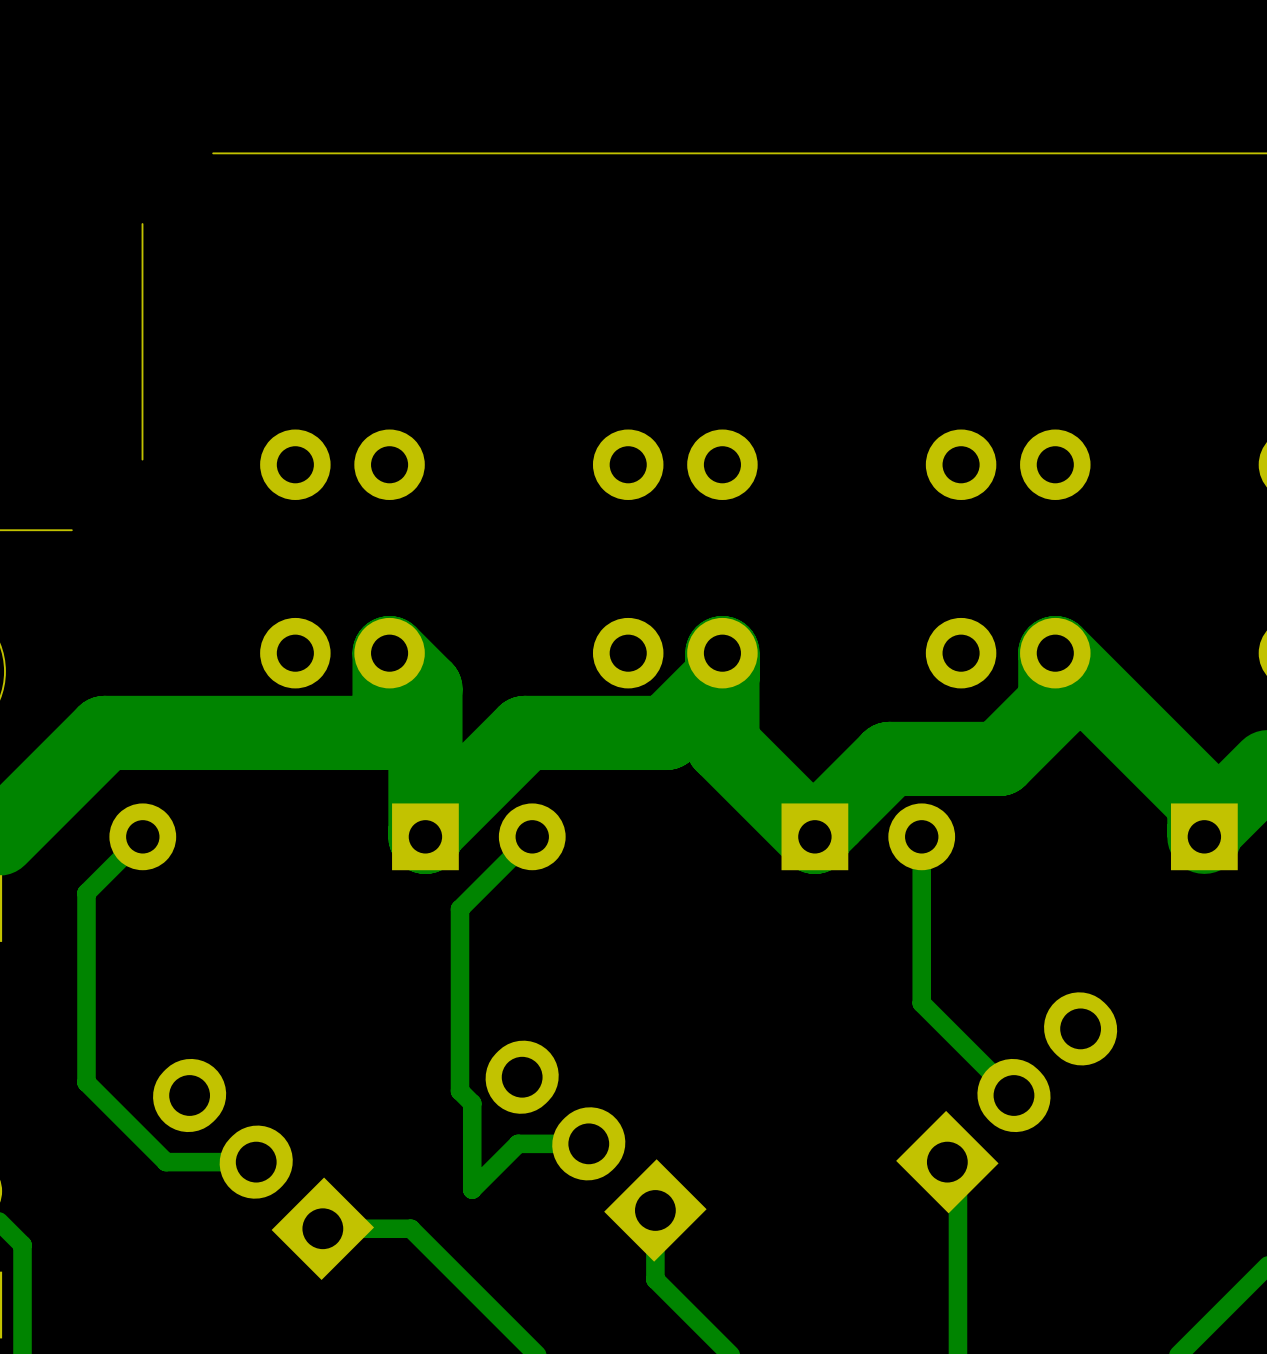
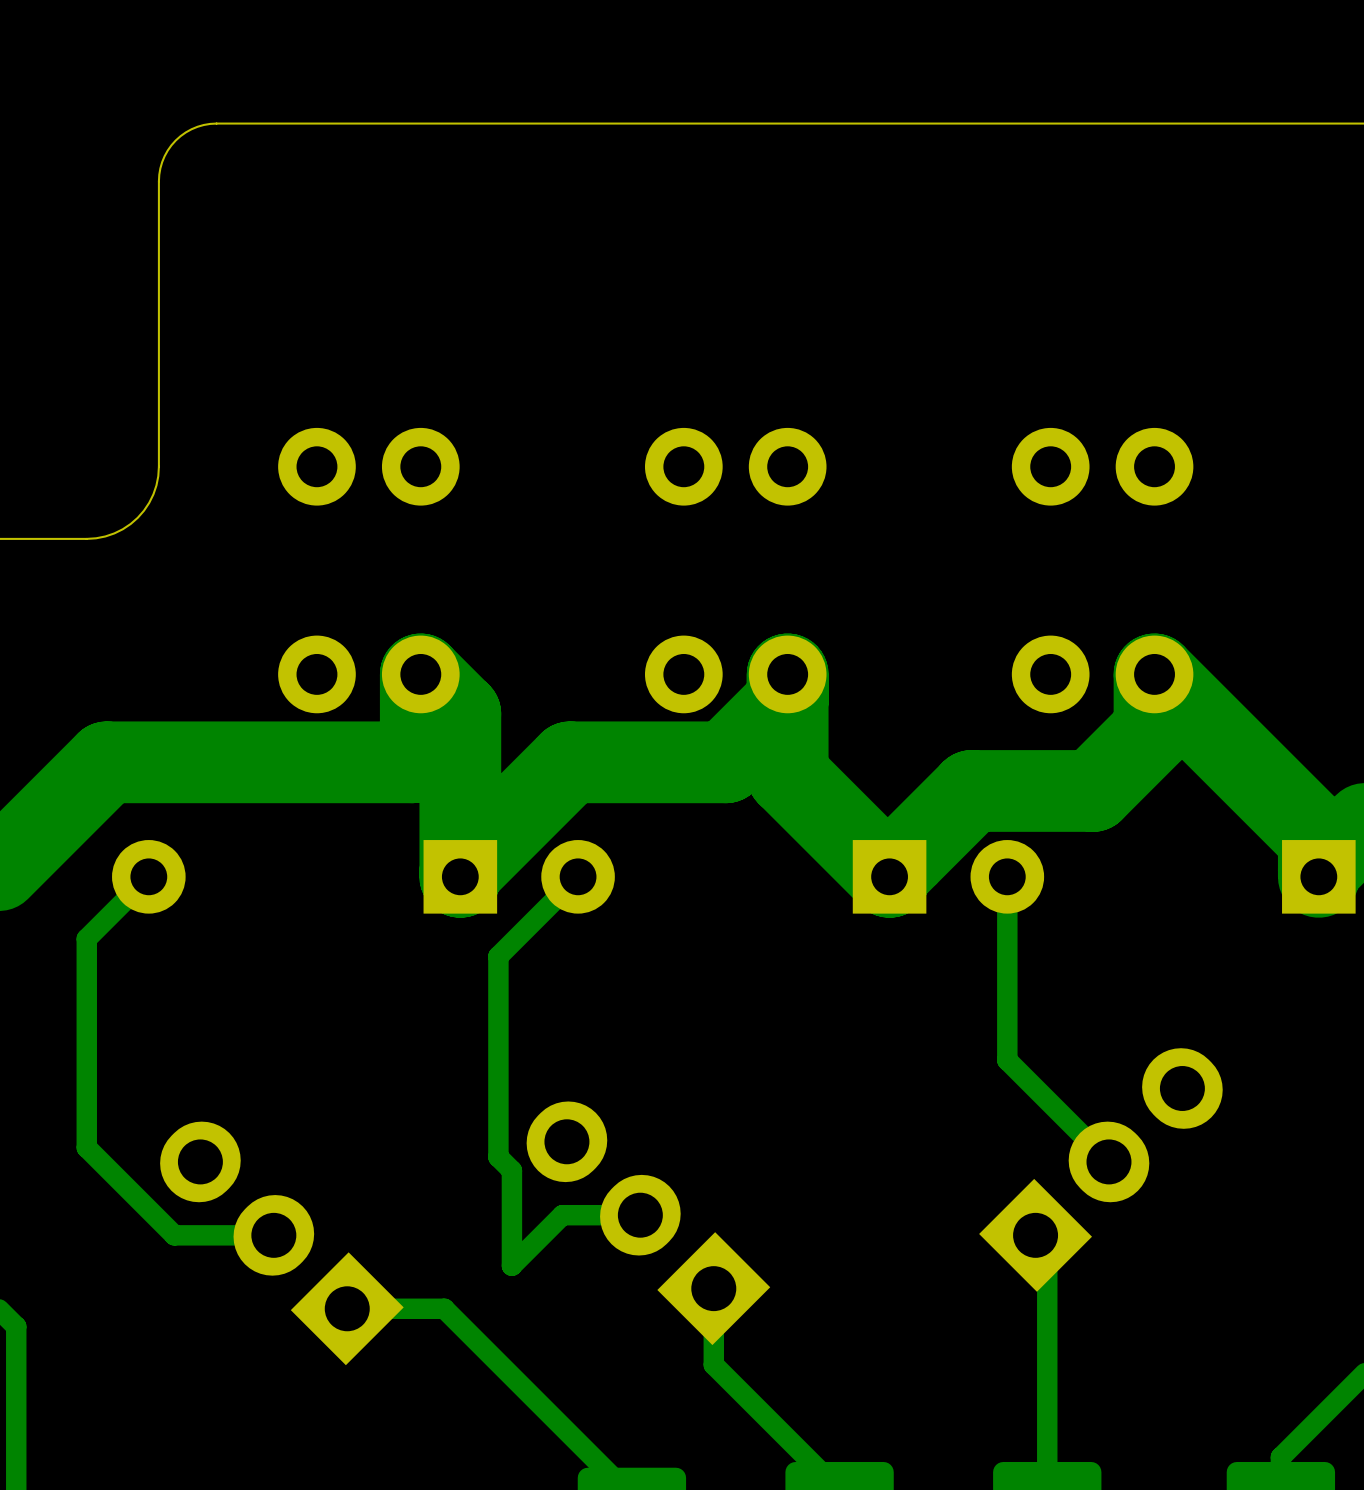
board edge: none -> (226, 123) (203, 125) (185, 132) (167, 150) (160, 168) (158, 466) (153, 494) (137, 517) (122, 529) (96, 538) (70, 538)
board edge: (142, 224) (142, 459) -> none

